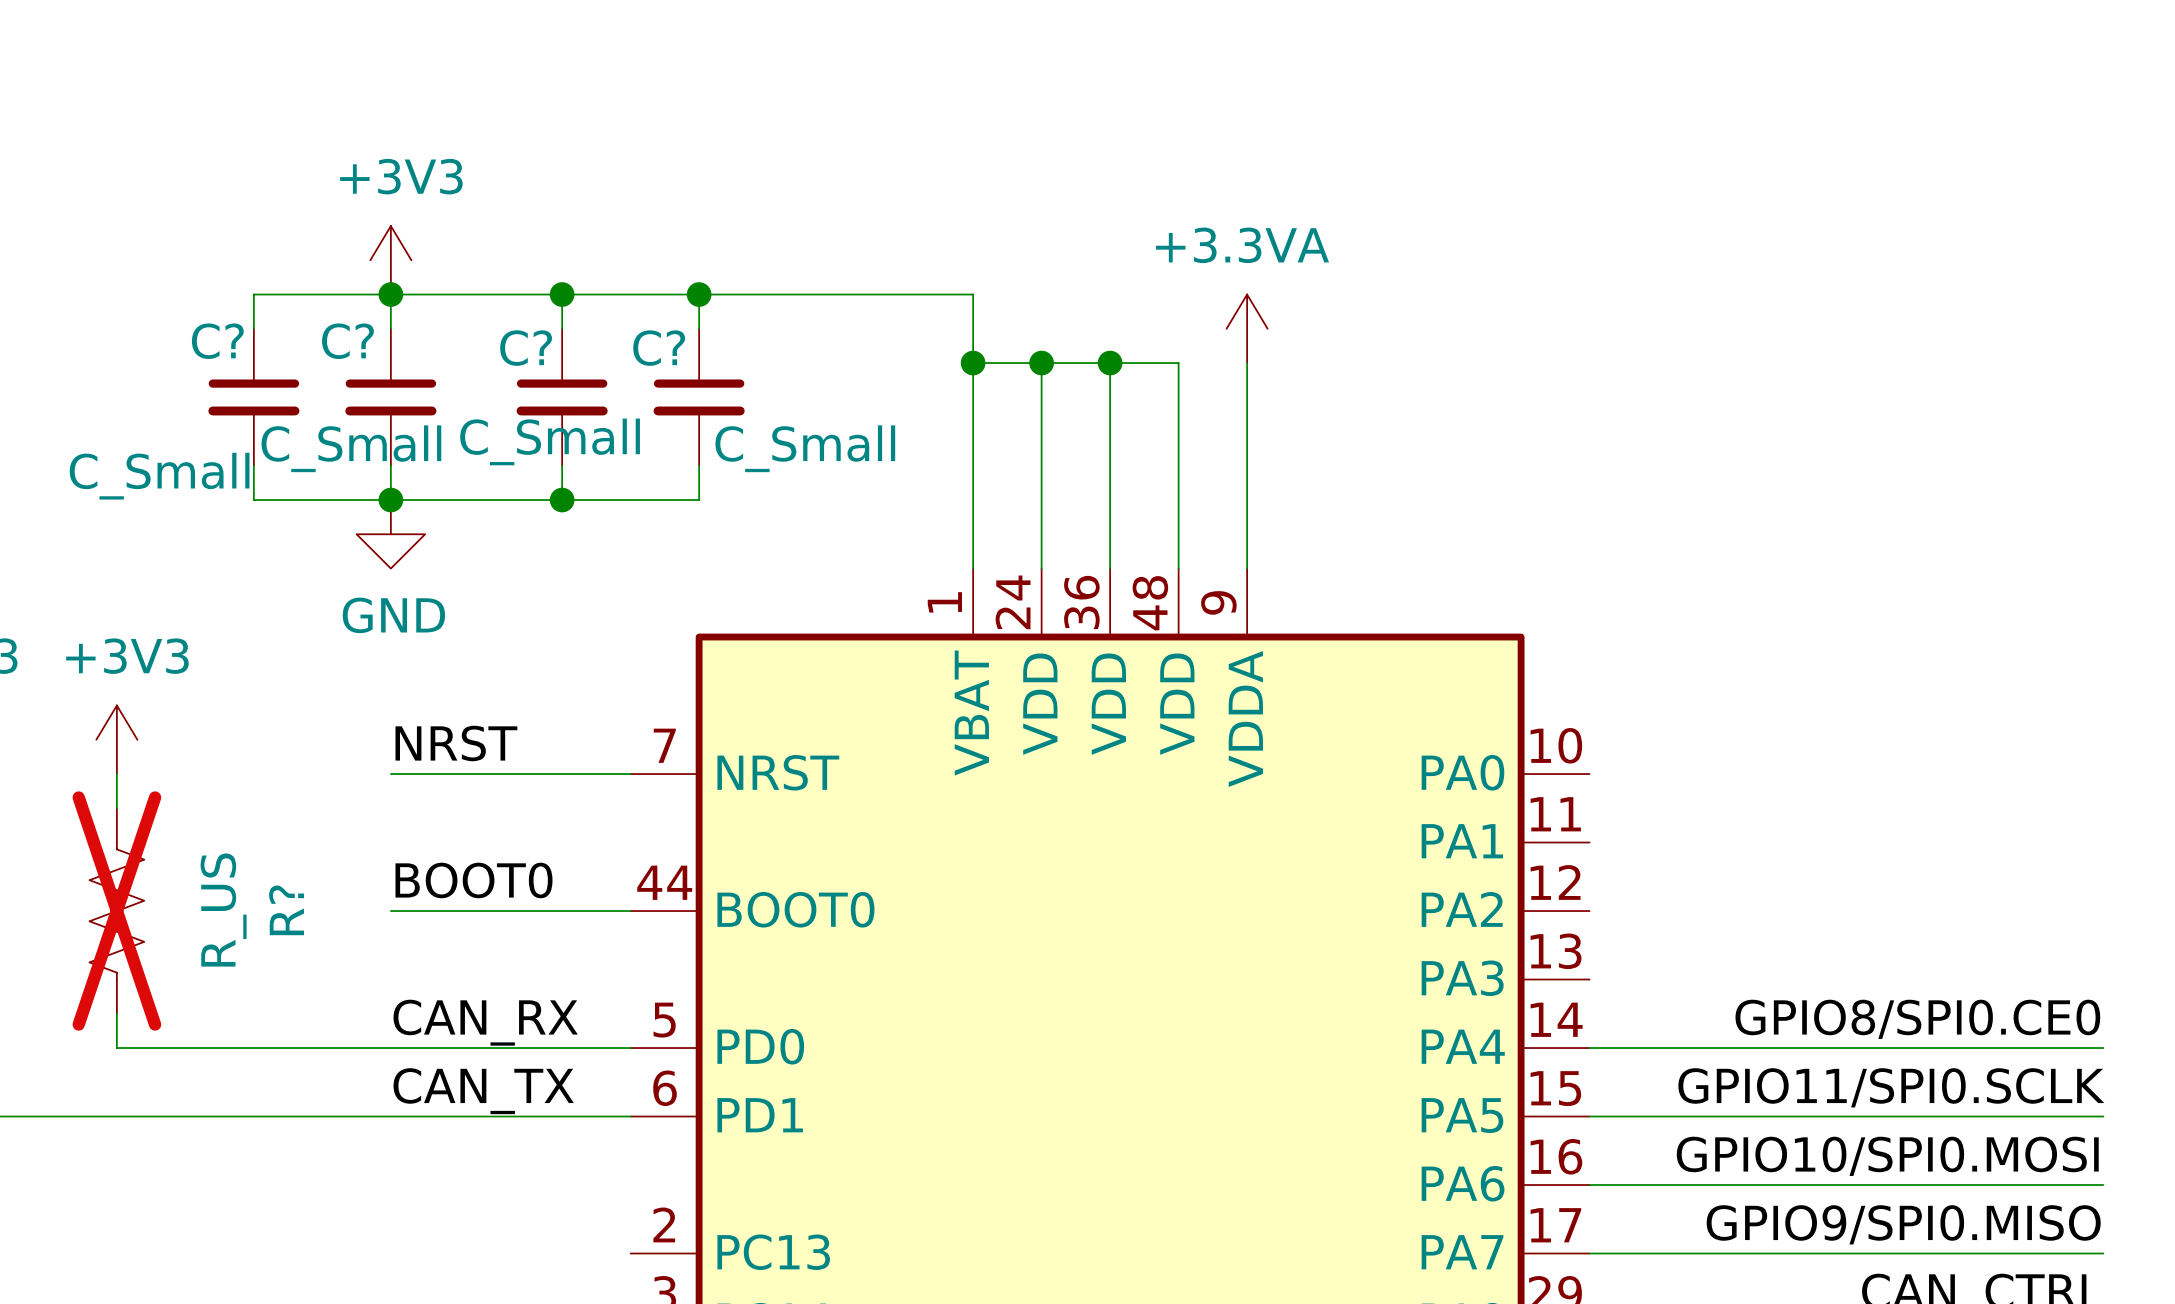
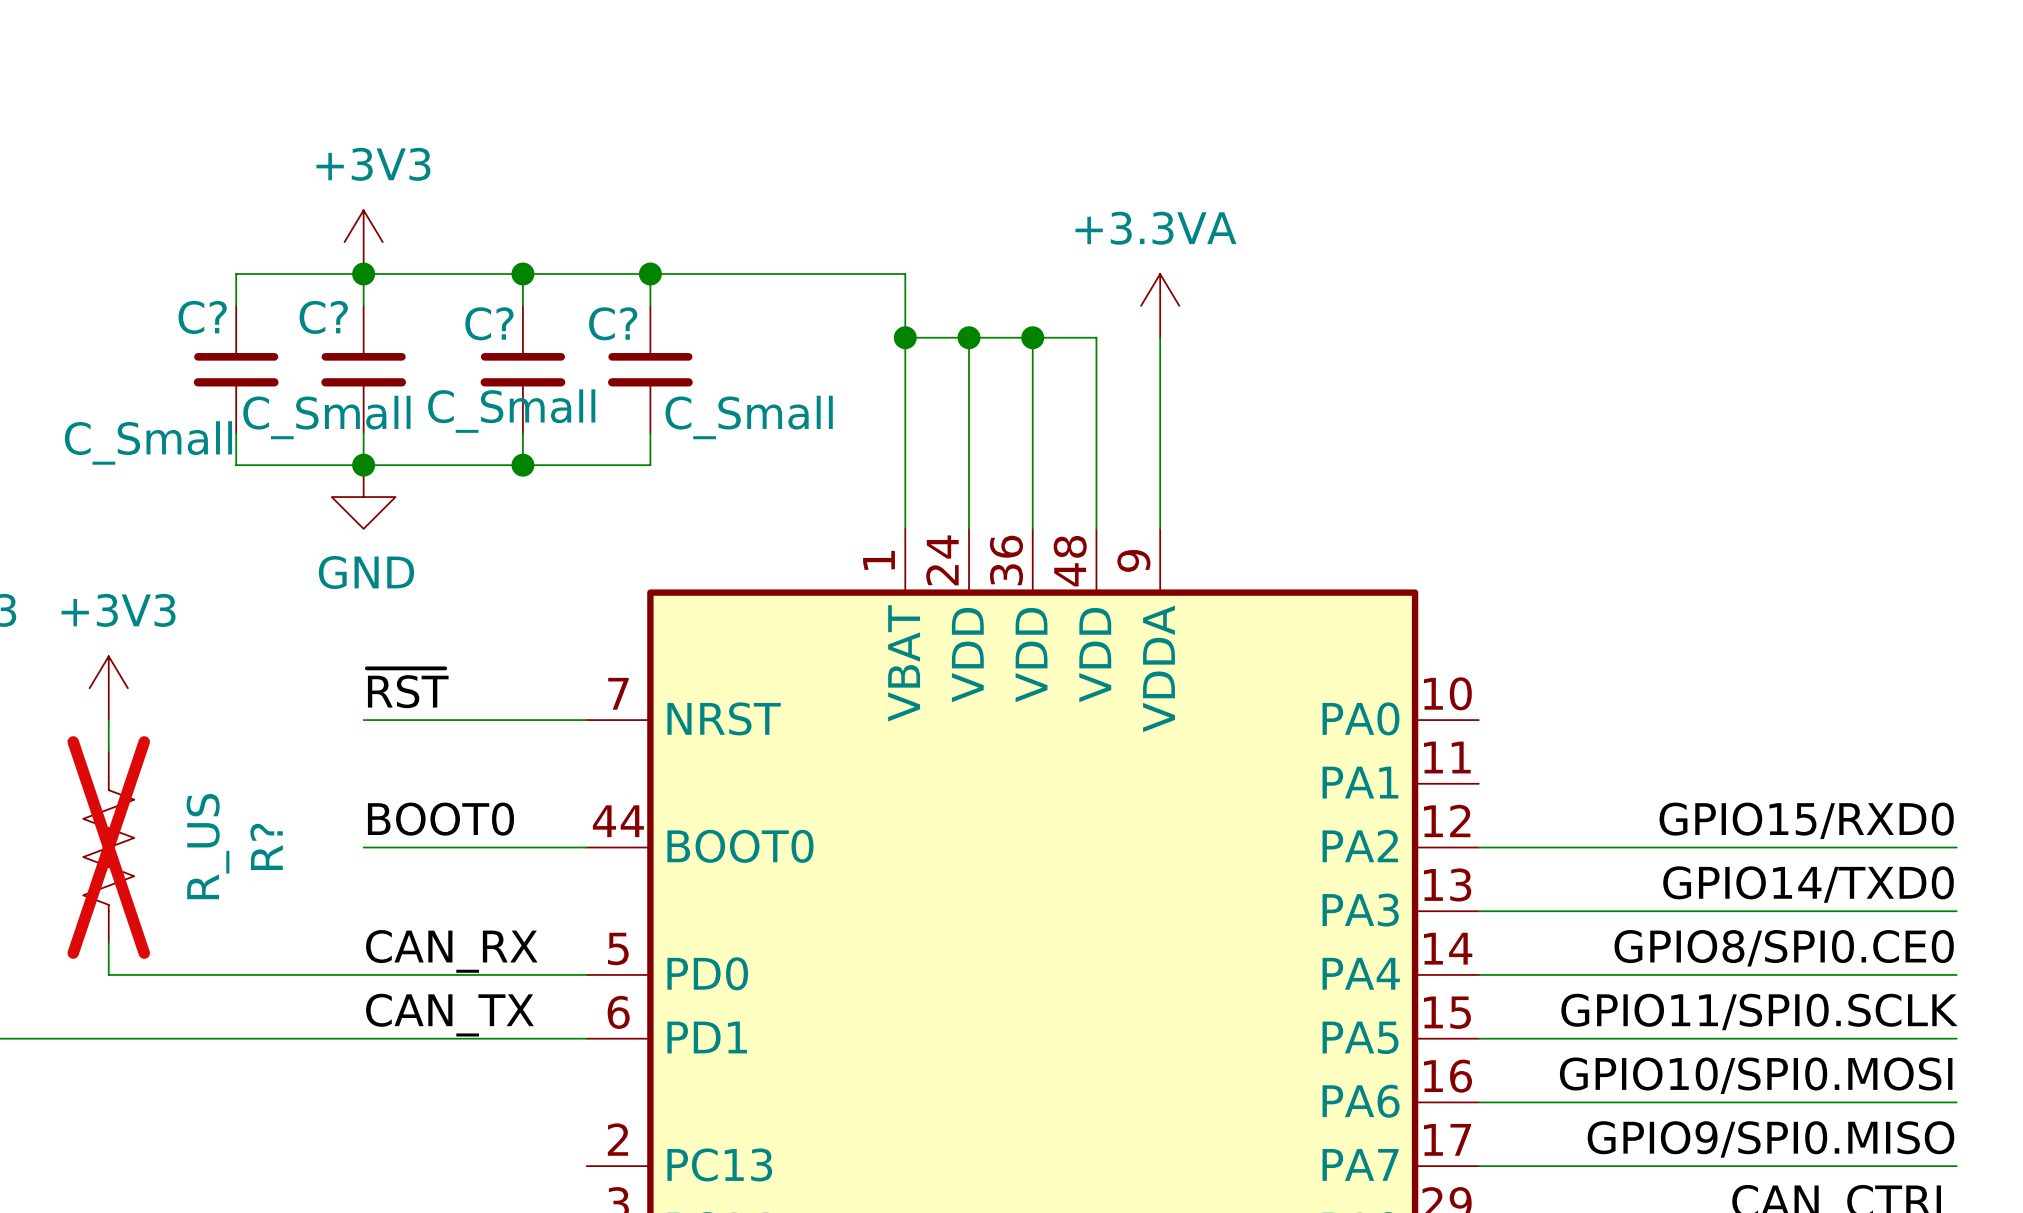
label: NRST (456, 743) -> ~{RST} (407, 688)
label: none -> GPIO15/RXD0 (1806, 820)
wire: none -> (1478, 847) (1956, 847)
label: none -> GPIO14/TXD0 (1808, 884)
wire: none -> (1478, 911) (1956, 911)

